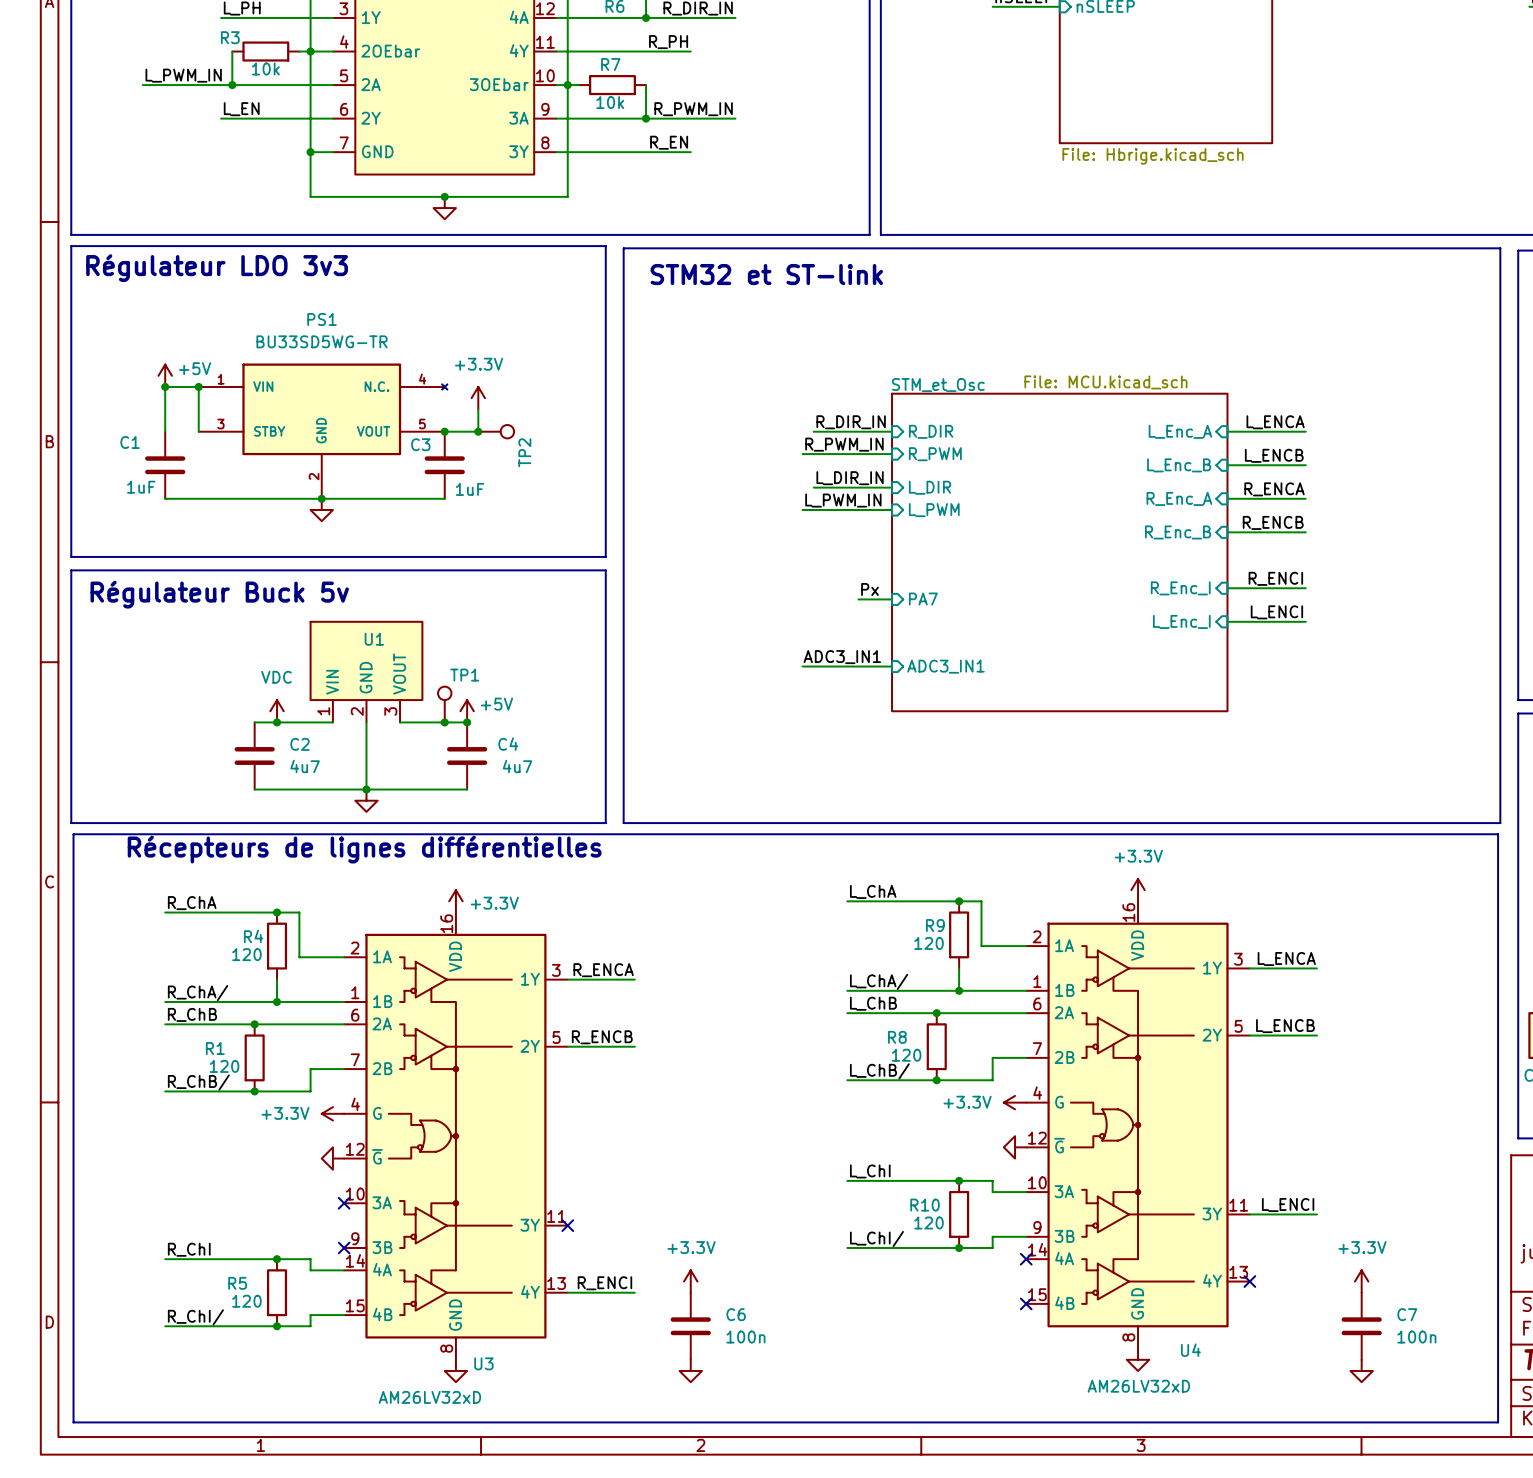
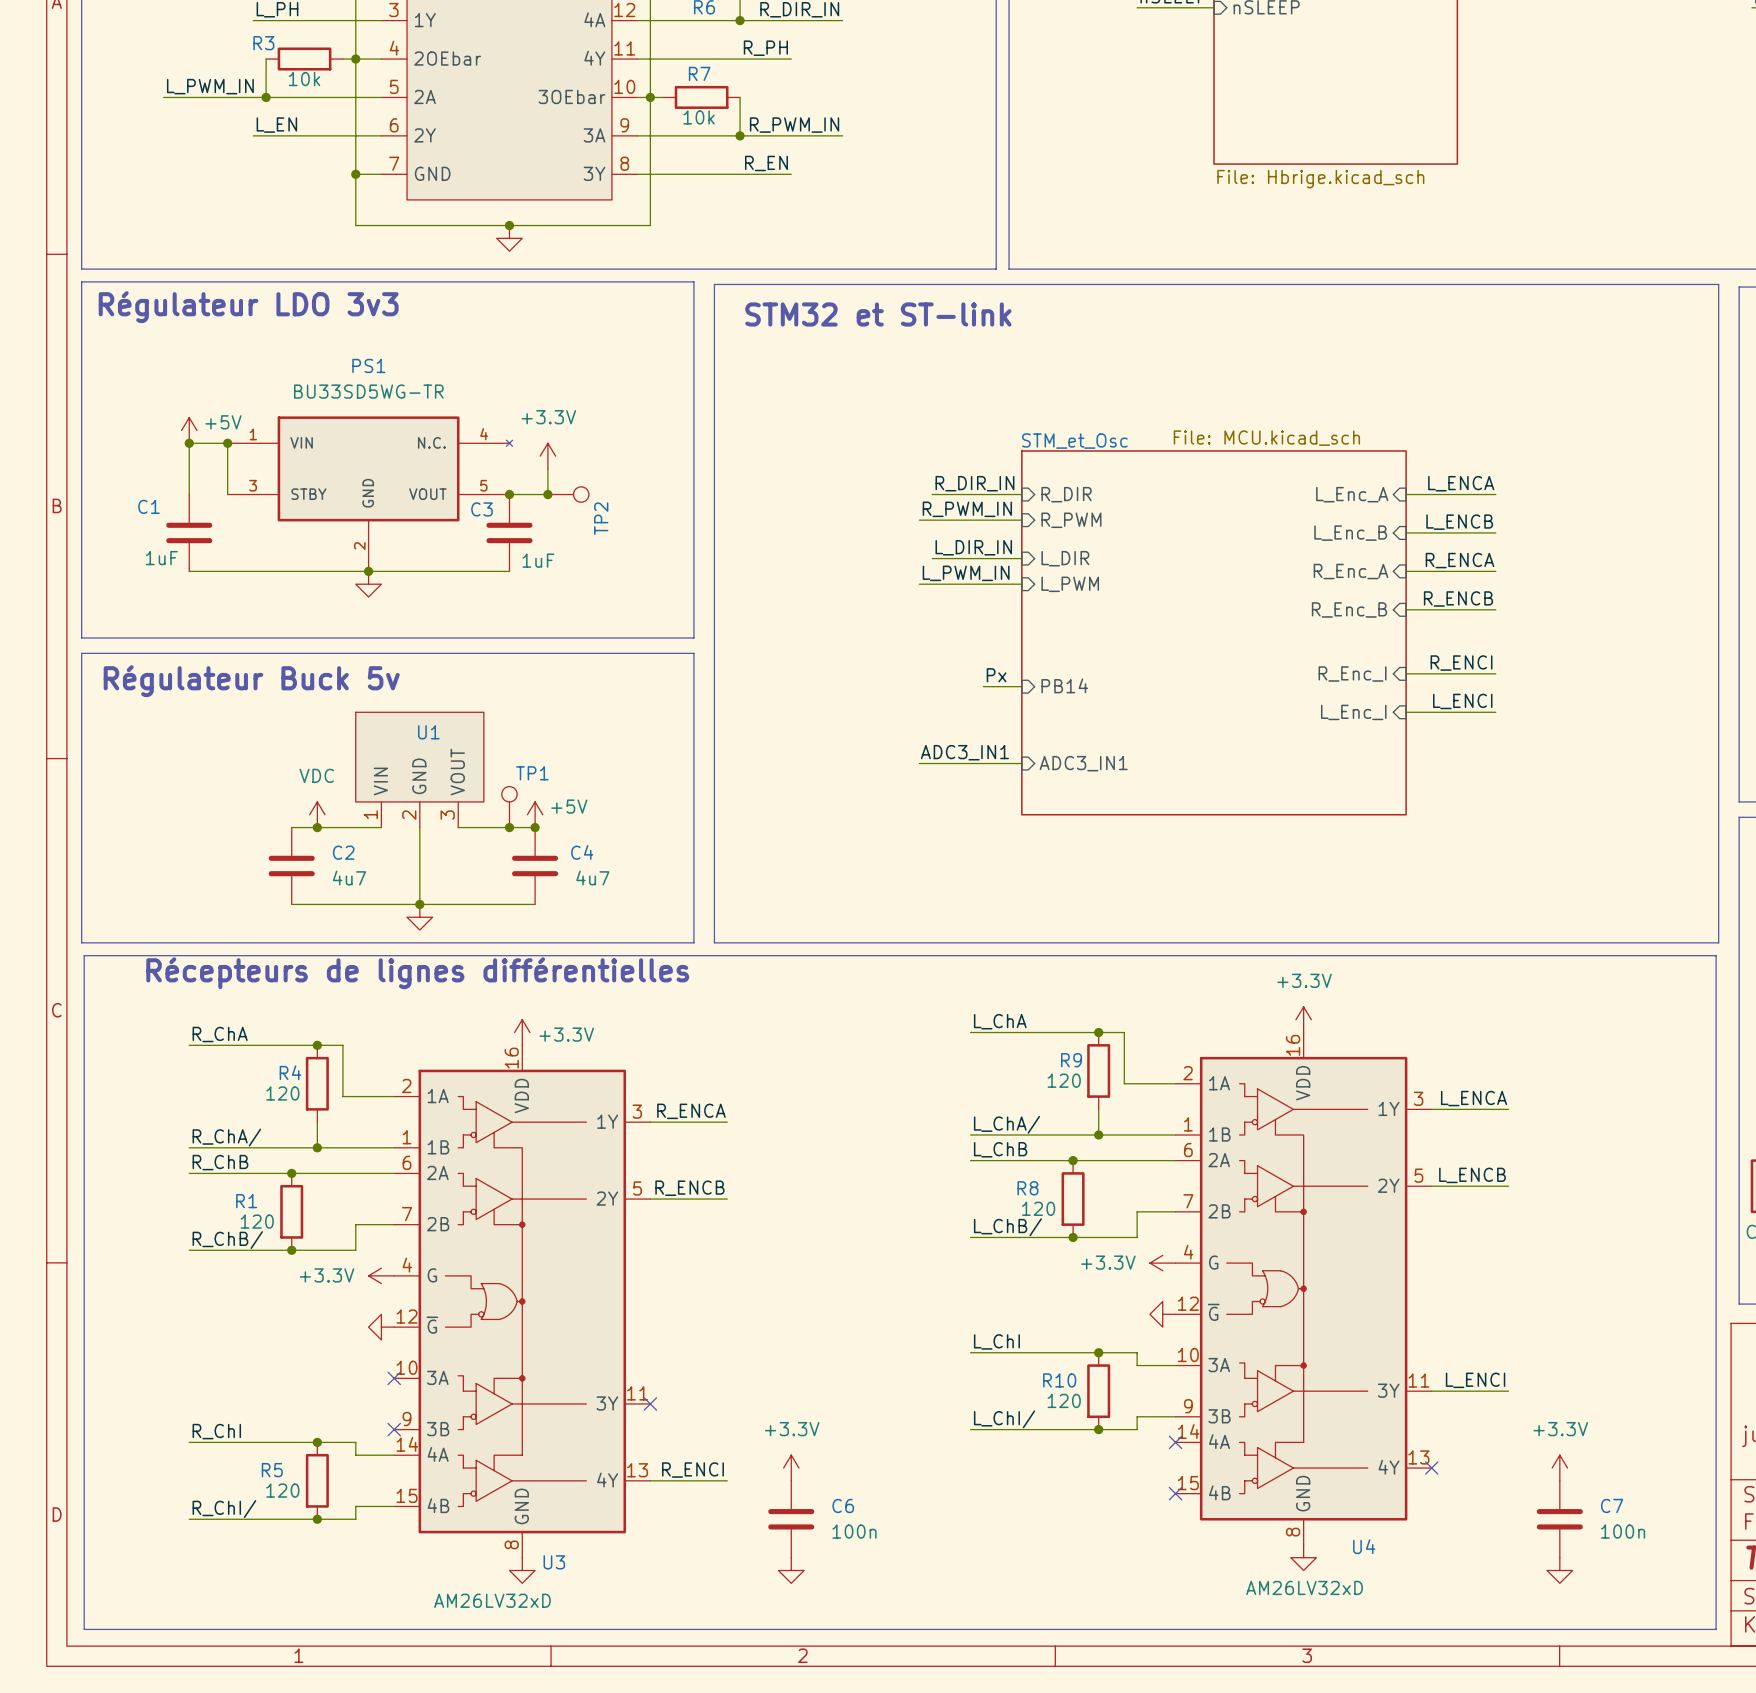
sheet pin: PA7 (923, 599) -> PB14 (1064, 685)

